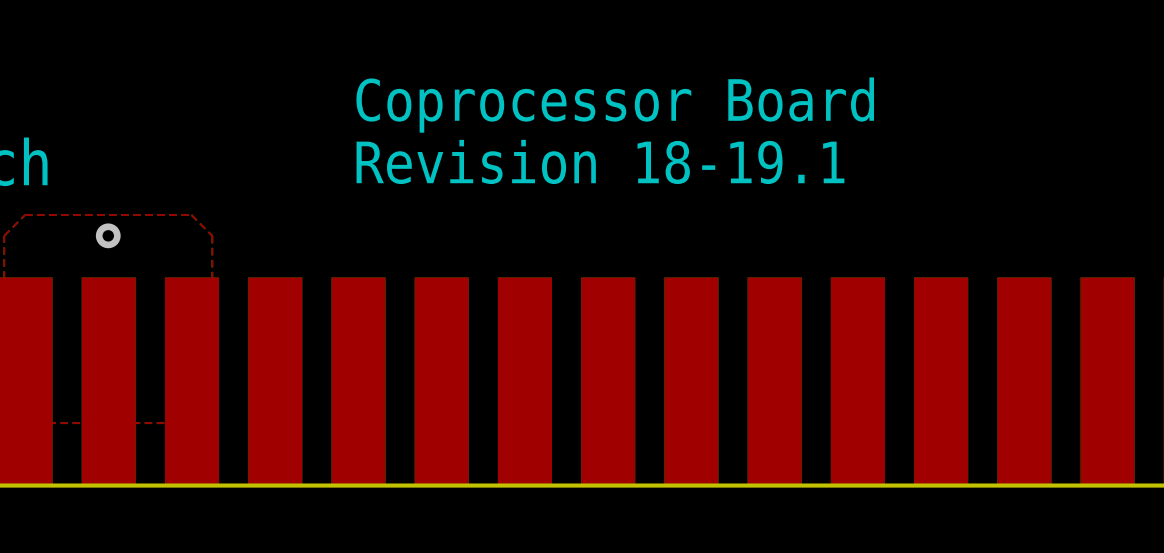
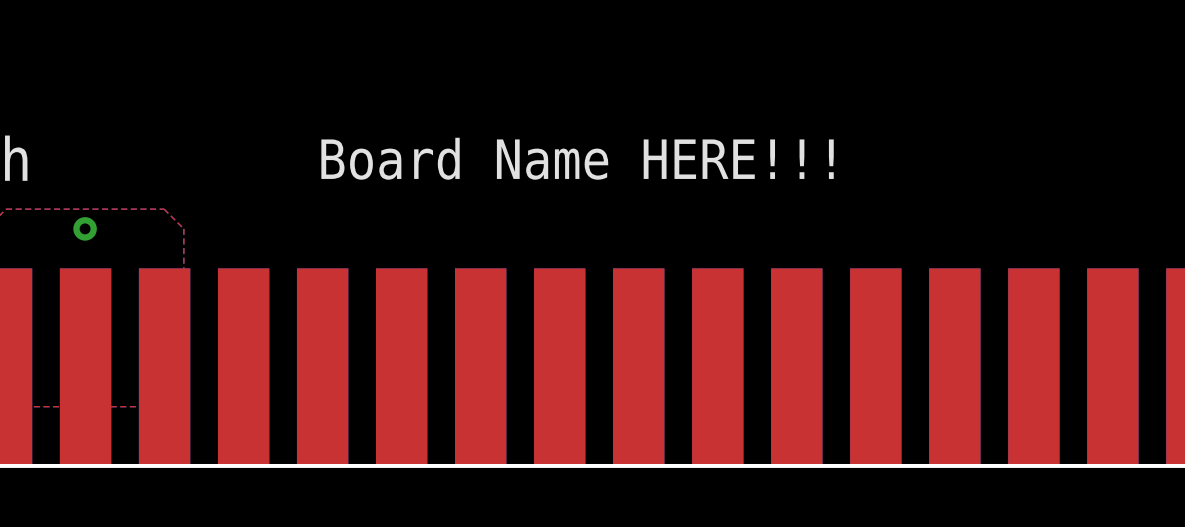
text: Coprocessor Board (615, 105) -> none
text: Revision 18-19.1 (600, 161) -> Board Name HERE!!! (577, 158)

